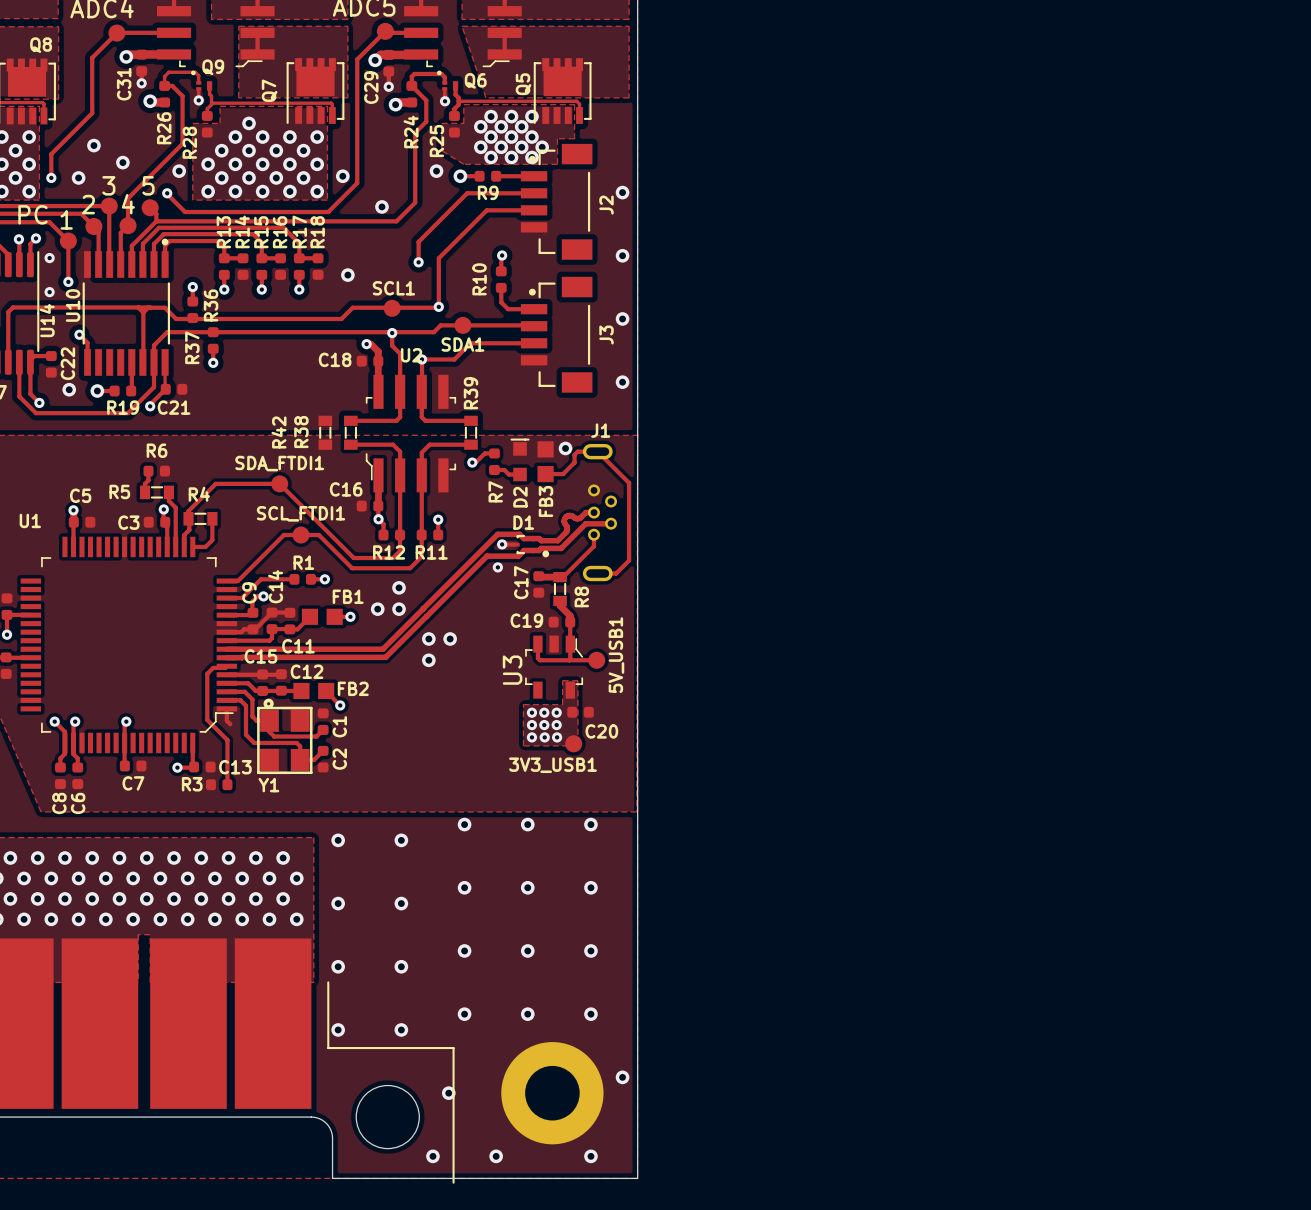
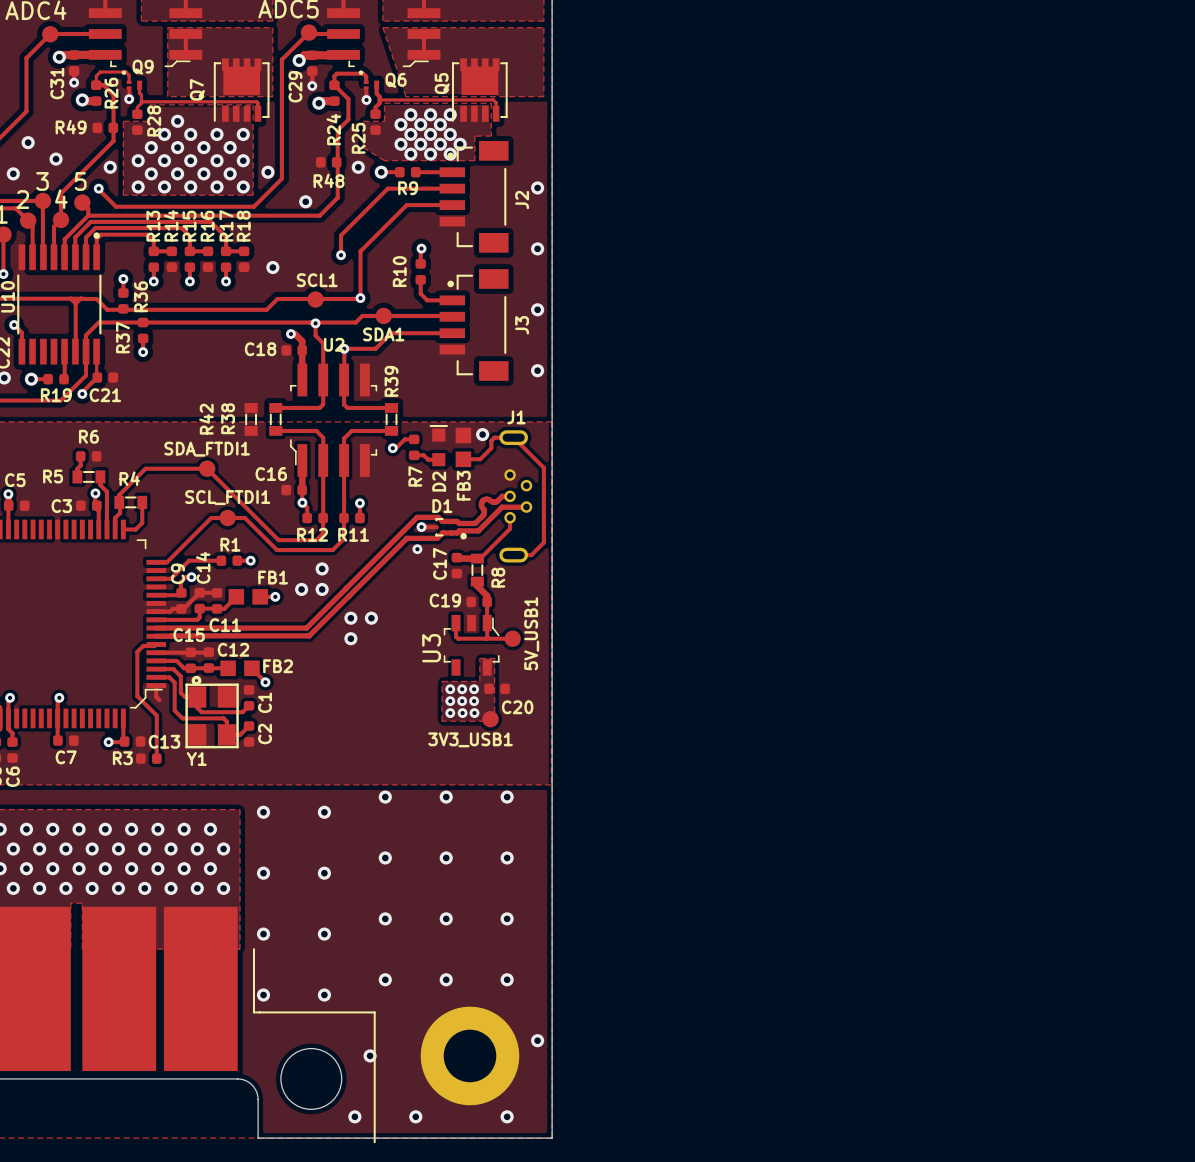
R26 name position: R26 (164, 128) -> R26 (111, 93)
R49: none -> (105, 127)
R28 name position: R28 (189, 142) -> R28 (154, 121)
R48: none -> (328, 162)

